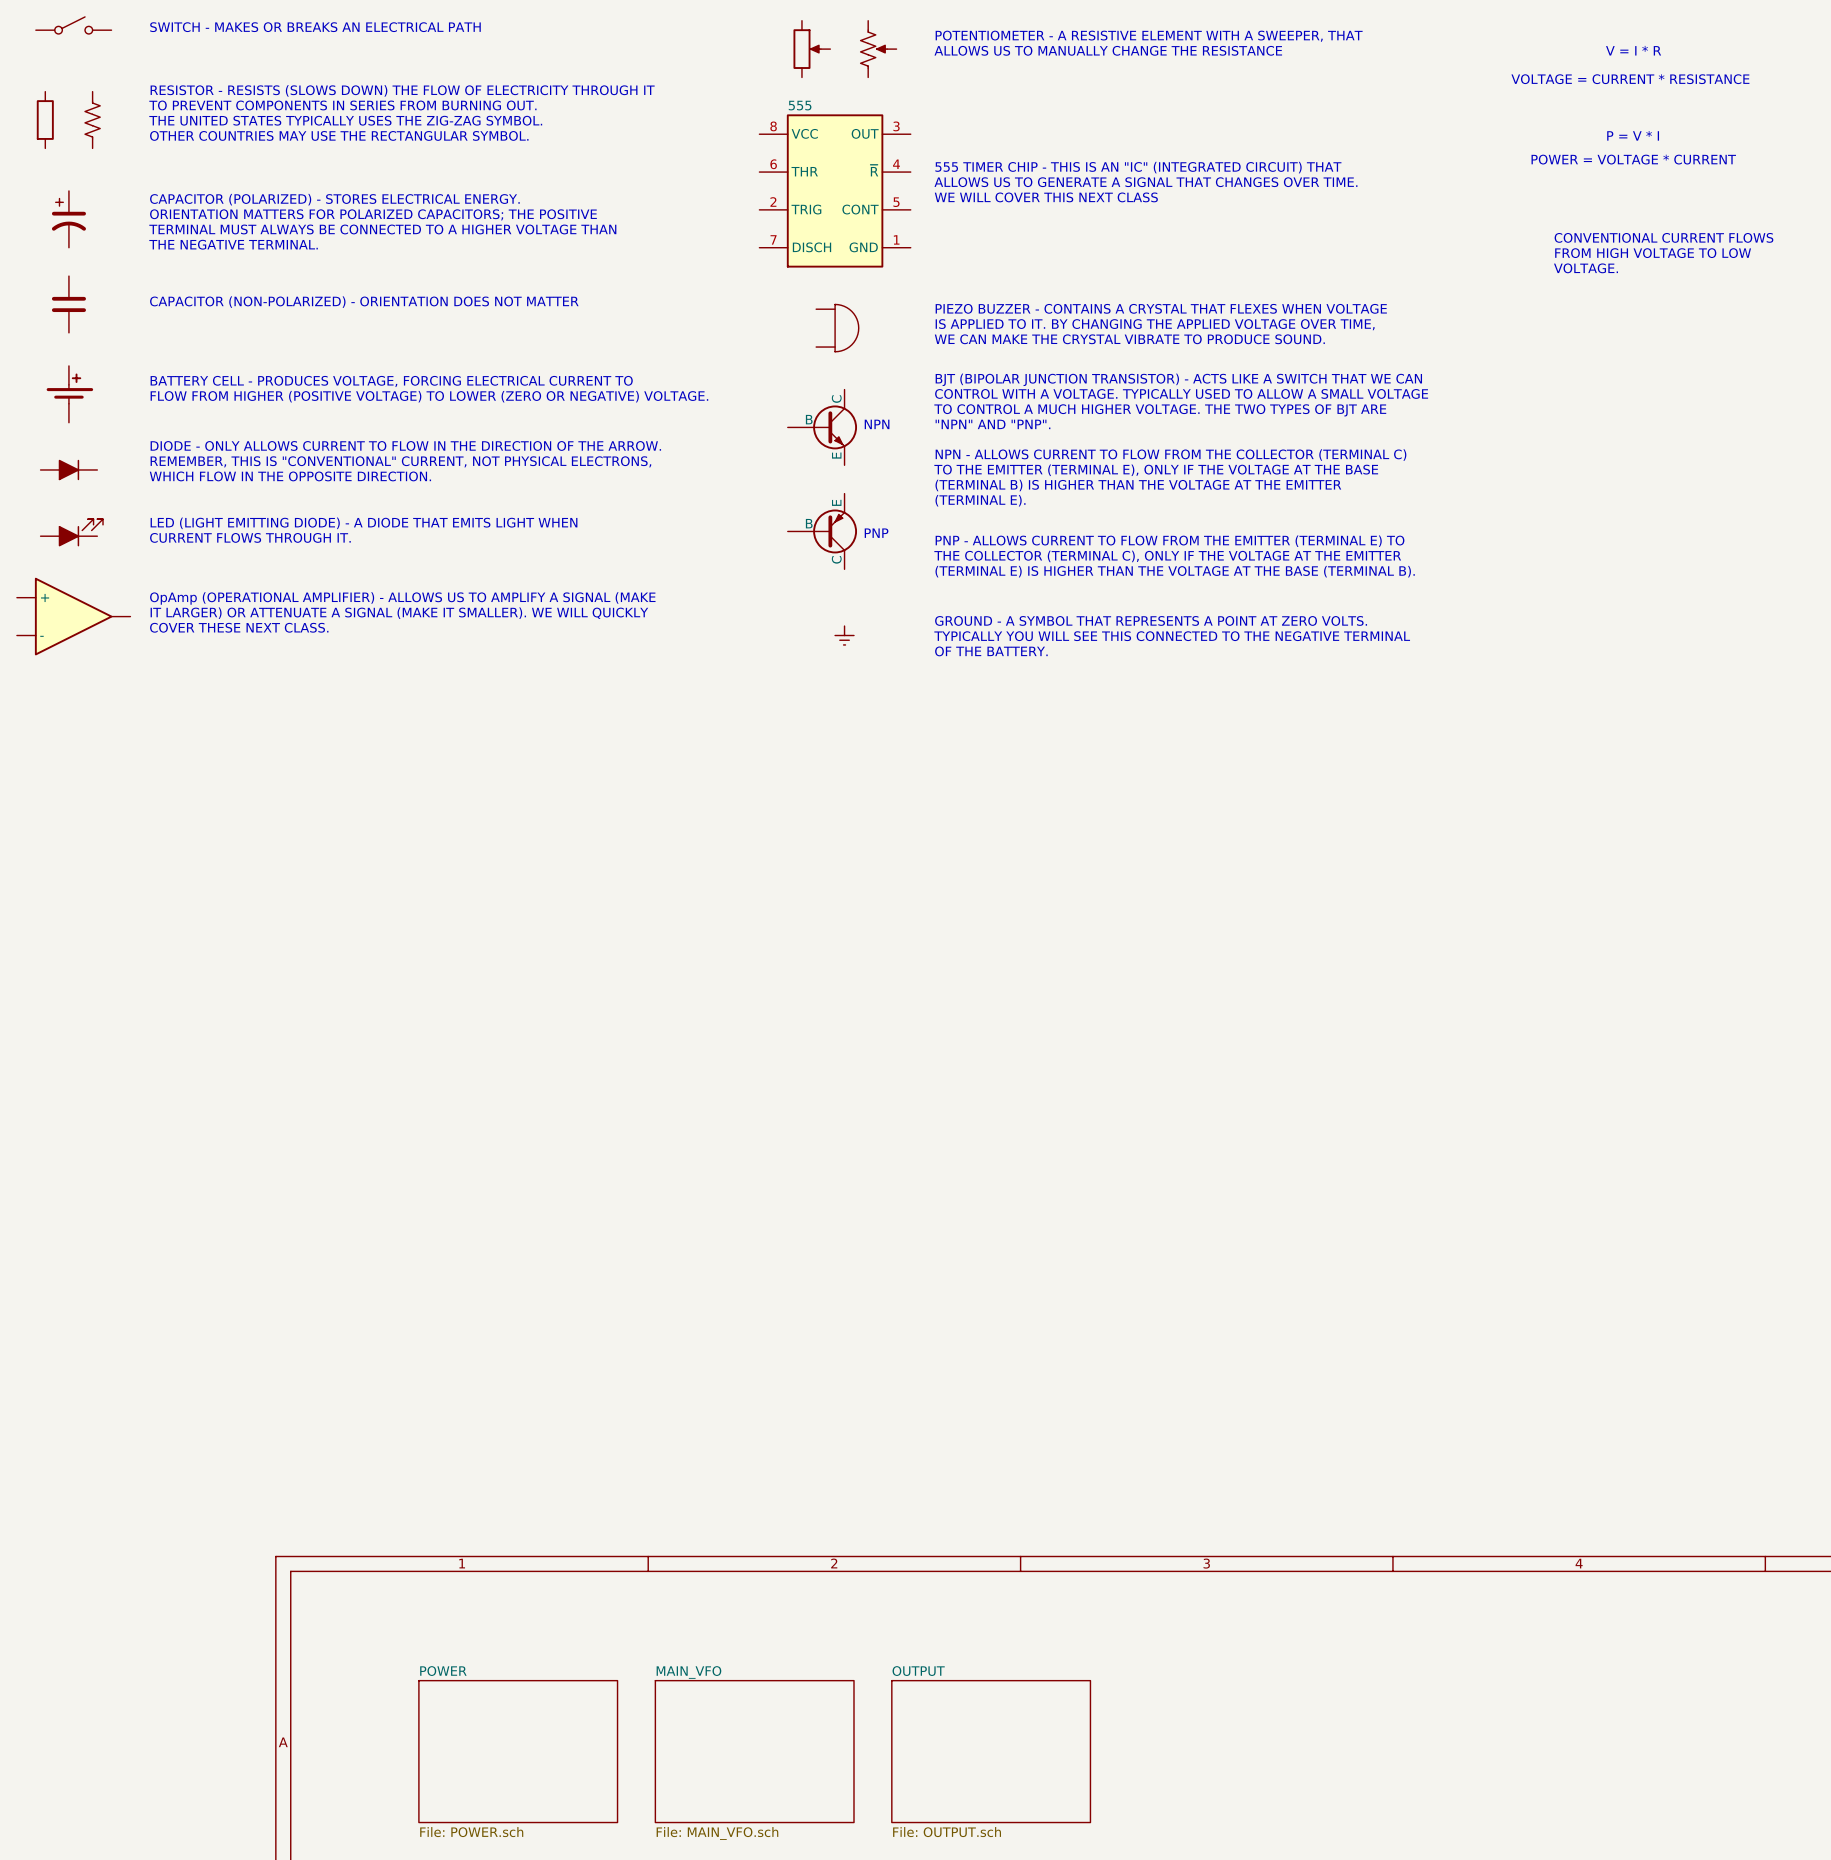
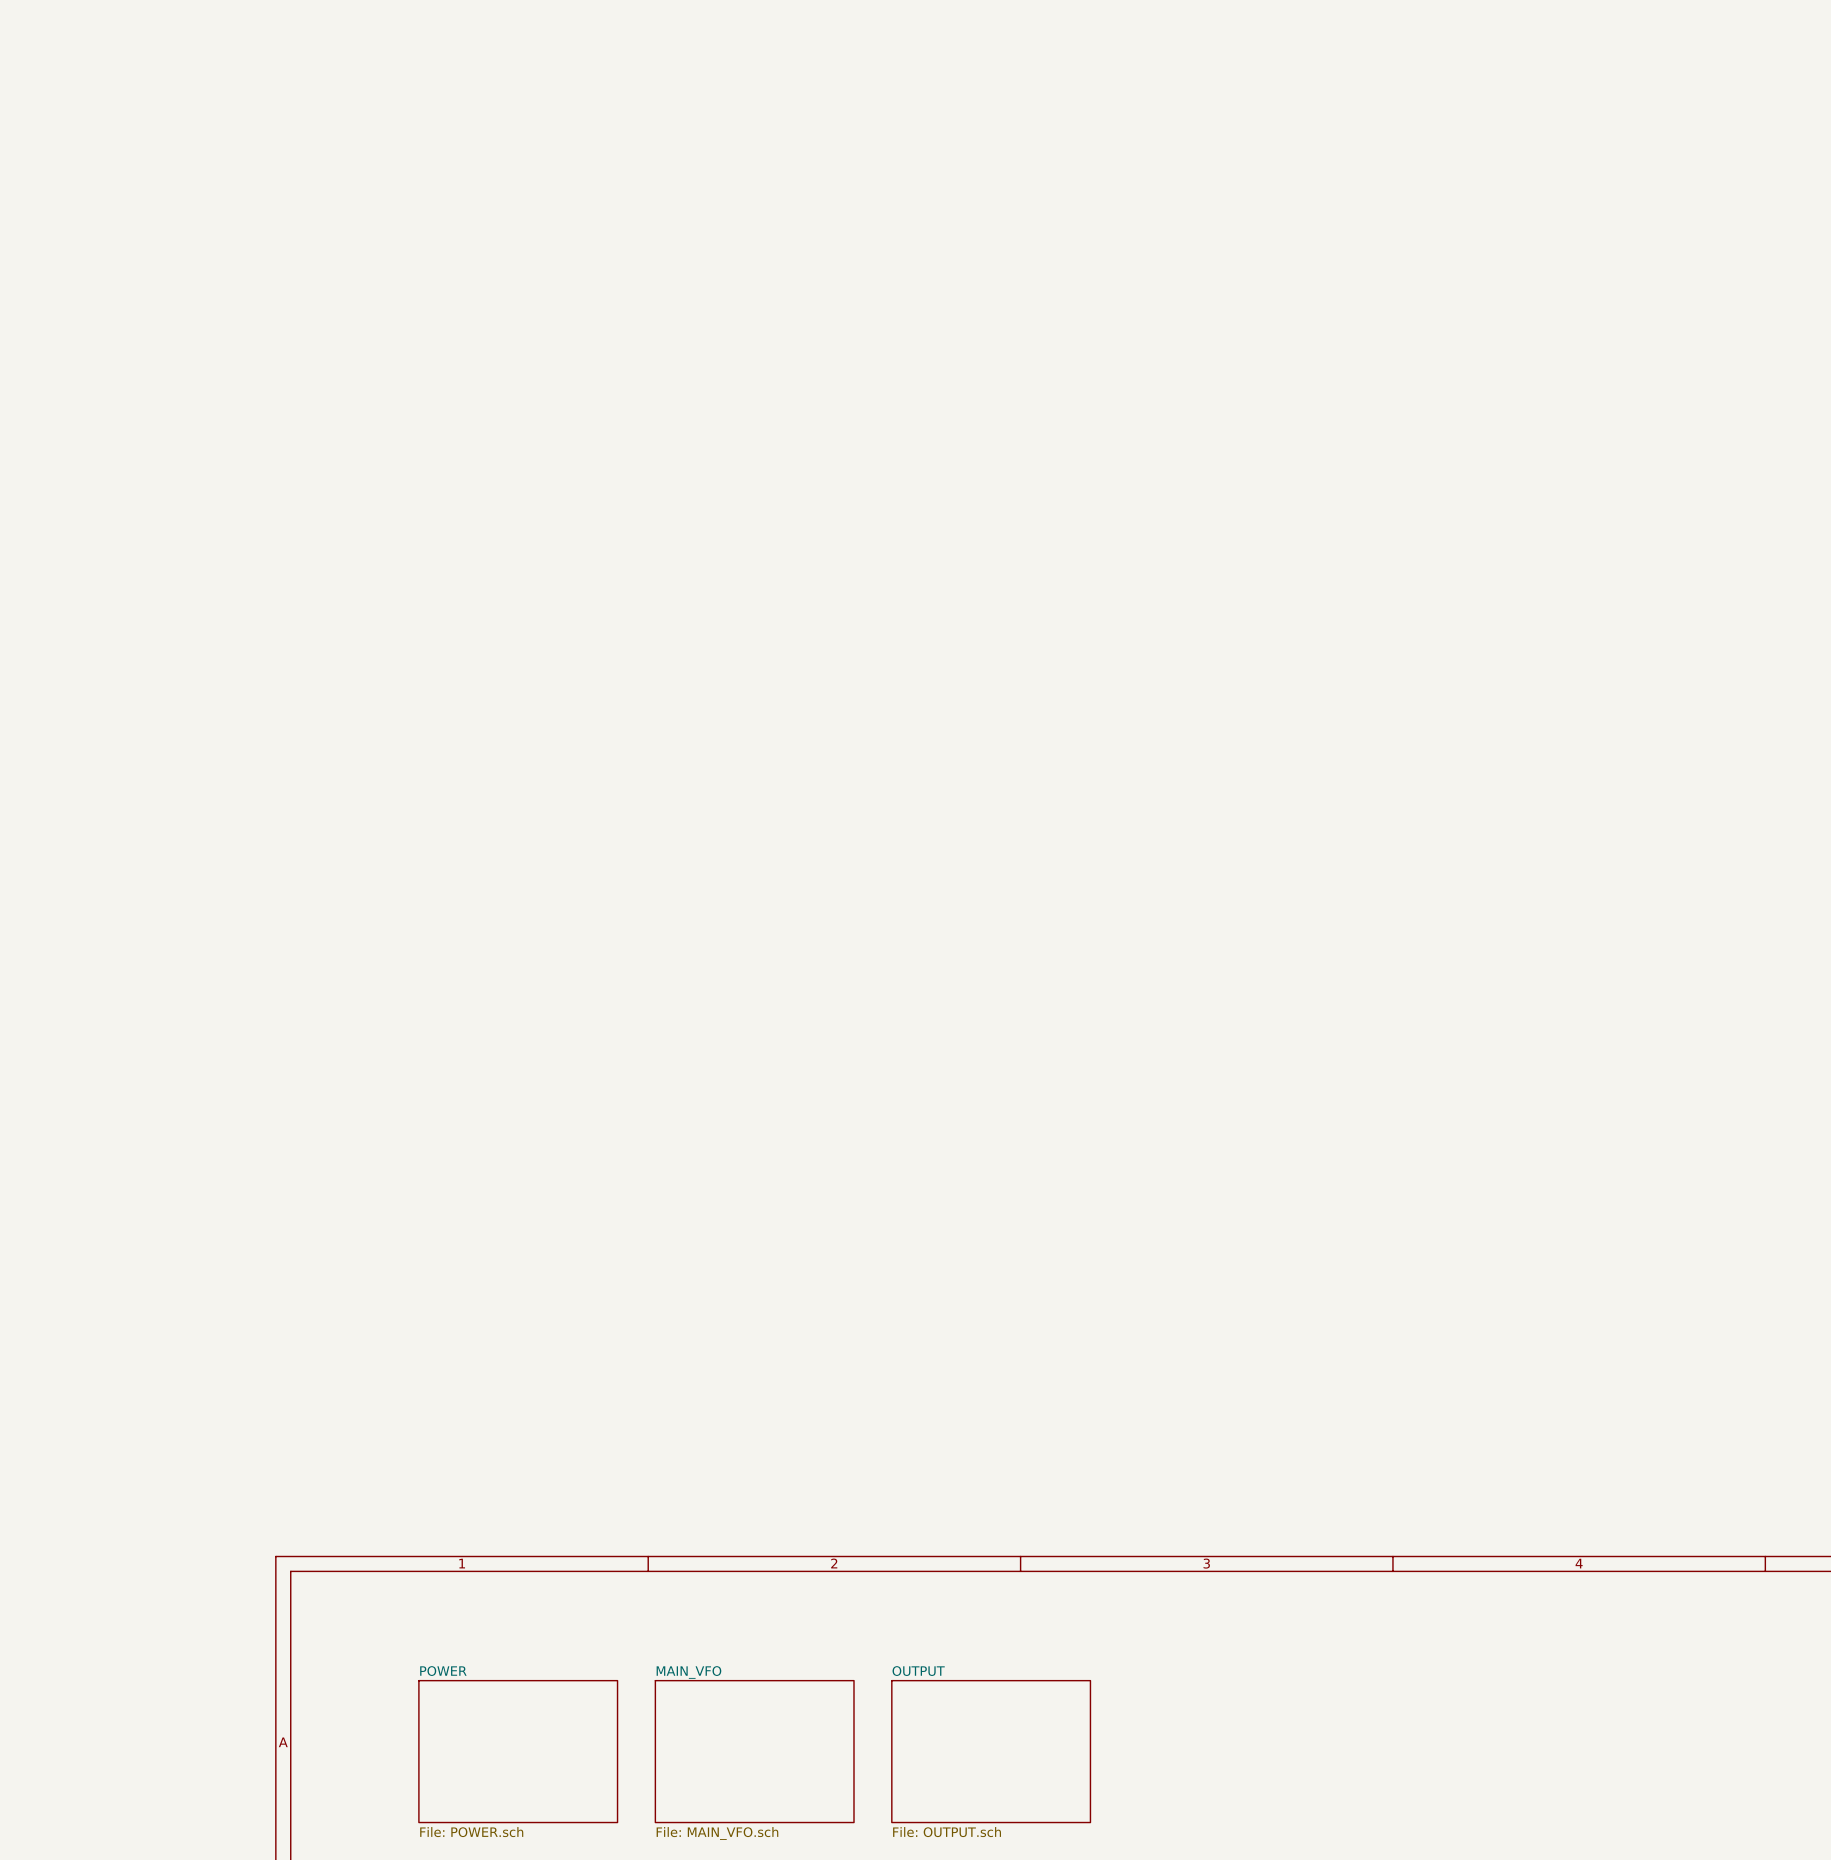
part: (73, 25) -> none
text: SWITCH - MAKES OR BREAKS AN ELECTRICAL PATH (315, 27) -> none
text: POTENTIOMETER - A RESISTIVE ELEMENT WITH A SWEEPER, THAT (1149, 36) -> none
part: (811, 49) -> none
part: (878, 49) -> none
text: ALLOWS US TO MANUALLY CHANGE THE RESISTANCE (1108, 50) -> none
text: V = I * R (1633, 50) -> none
text: VOLTAGE = CURRENT * RESISTANCE (1630, 79) -> none
text: RESISTOR - RESISTS (SLOWS DOWN) THE FLOW OF ELECTRICITY THROUGH IT (402, 90) -> none
text: TO PREVENT COMPONENTS IN SERIES FROM BURNING OUT. (342, 105) -> none
part: (45, 120) -> none
part: (92, 120) -> none
text: THE UNITED STATES TYPICALLY USES THE ZIG-ZAG SYMBOL. (345, 120) -> none
text: OTHER COUNTRIES MAY USE THE RECTANGULAR SYMBOL. (339, 135) -> none
text: P = V * I (1633, 135) -> none
text: POWER = VOLTAGE * CURRENT (1633, 159) -> none
text: 555 TIMER CHIP - THIS IS AN "IC" (INTEGRATED CIRCUIT) THAT (1138, 167) -> none
text: ALLOWS US TO GENERATE A SIGNAL THAT CHANGES OVER TIME. (1145, 182) -> none
part: 555 (835, 190) -> none
text: WE WILL COVER THIS NEXT CLASS (1046, 197) -> none
text: CAPACITOR (POLARIZED) - STORES ELECTRICAL ENERGY. (334, 199) -> none
text: ORIENTATION MATTERS FOR POLARIZED CAPACITORS; THE POSITIVE (373, 214) -> none
part: (68, 219) -> none
text: TERMINAL MUST ALWAYS BE CONNECTED TO A HIGHER VOLTAGE THAN (382, 229) -> none
text: CONVENTIONAL CURRENT FLOWS (1663, 237) -> none
text: THE NEGATIVE TERMINAL. (233, 244) -> none
text: FROM HIGH VOLTAGE TO LOW (1653, 253) -> none
text: VOLTAGE. (1586, 268) -> none
text: CAPACITOR (NON-POLARIZED) - ORIENTATION DOES NOT MATTER (364, 302) -> none
part: (68, 304) -> none
text: PIEZO BUZZER - CONTAINS A CRYSTAL THAT FLEXES WHEN VOLTAGE (1161, 308) -> none
text: IS APPLIED TO IT. BY CHANGING THE APPLIED VOLTAGE OVER TIME, (1155, 324) -> none
part: (837, 328) -> none
text: WE CAN MAKE THE CRYSTAL VIBRATE TO PRODUCE SOUND. (1129, 339) -> none
text: BJT (BIPOLAR JUNCTION TRANSISTOR) - ACTS LIKE A SWITCH THAT WE CAN (1178, 379) -> none
text: BATTERY CELL - PRODUCES VOLTAGE, FORCING ELECTRICAL CURRENT TO (391, 381) -> none
text: CONTROL WITH A VOLTAGE. TYPICALLY USED TO ALLOW A SMALL VOLTAGE (1181, 393) -> none
part: (69, 394) -> none
text: FLOW FROM HIGHER (POSITIVE VOLTAGE) TO LOWER (ZERO OR NEGATIVE) VOLTAGE. (429, 396) -> none
text: TO CONTROL A MUCH HIGHER VOLTAGE. THE TWO TYPES OF BJT ARE (1160, 410) -> none
text: NPN (877, 424) -> none
text: "NPN" AND "PNP". (993, 424) -> none
part: (822, 427) -> none
text: DIODE - ONLY ALLOWS CURRENT TO FLOW IN THE DIRECTION OF THE ARROW. (405, 445) -> none
text: NPN - ALLOWS CURRENT TO FLOW FROM THE COLLECTOR (TERMINAL C) (1171, 455) -> none
text: REMEMBER, THIS IS "CONVENTIONAL" CURRENT, NOT PHYSICAL ELECTRONS, (400, 461) -> none
part: (68, 469) -> none
text: TO THE EMITTER (TERMINAL E), ONLY IF THE VOLTAGE AT THE BASE (1156, 470) -> none
text: WHICH FLOW IN THE OPPOSITE DIRECTION. (290, 476) -> none
text: (TERMINAL B) IS HIGHER THAN THE VOLTAGE AT THE EMITTER (1138, 485) -> none
text: (TERMINAL E). (980, 500) -> none
text: LED (LIGHT EMITTING DIODE) - A DIODE THAT EMITS LIGHT WHEN (364, 523) -> none
part: (822, 531) -> none
part: (71, 532) -> none
text: PNP (876, 533) -> none
text: CURRENT FLOWS THROUGH IT. (250, 537) -> none
text: PNP - ALLOWS CURRENT TO FLOW FROM THE EMITTER (TERMINAL E) TO (1170, 541) -> none
text: THE COLLECTOR (TERMINAL C), ONLY IF THE VOLTAGE AT THE EMITTER (1167, 556) -> none
text: (TERMINAL E) IS HIGHER THAN THE VOLTAGE AT THE BASE (TERMINAL B). (1175, 571) -> none
text: OpAmp (OPERATIONAL AMPLIFIER) - ALLOWS US TO AMPLIFY A SIGNAL (MAKE (402, 598) -> none
text: IT LARGER) OR ATTENUATE A SIGNAL (MAKE IT SMALLER). WE WILL QUICKLY (399, 613) -> none
part: (73, 616) -> none
text: GROUND - A SYMBOL THAT REPRESENTS A POINT AT ZERO VOLTS. (1151, 620) -> none
text: COVER THESE NEXT CLASS. (239, 627) -> none
power symbol: (844, 635) -> none
text: TYPICALLY YOU WILL SEE THIS CONNECTED TO THE NEGATIVE TERMINAL (1172, 636) -> none
text: OF THE BATTERY. (991, 651) -> none

